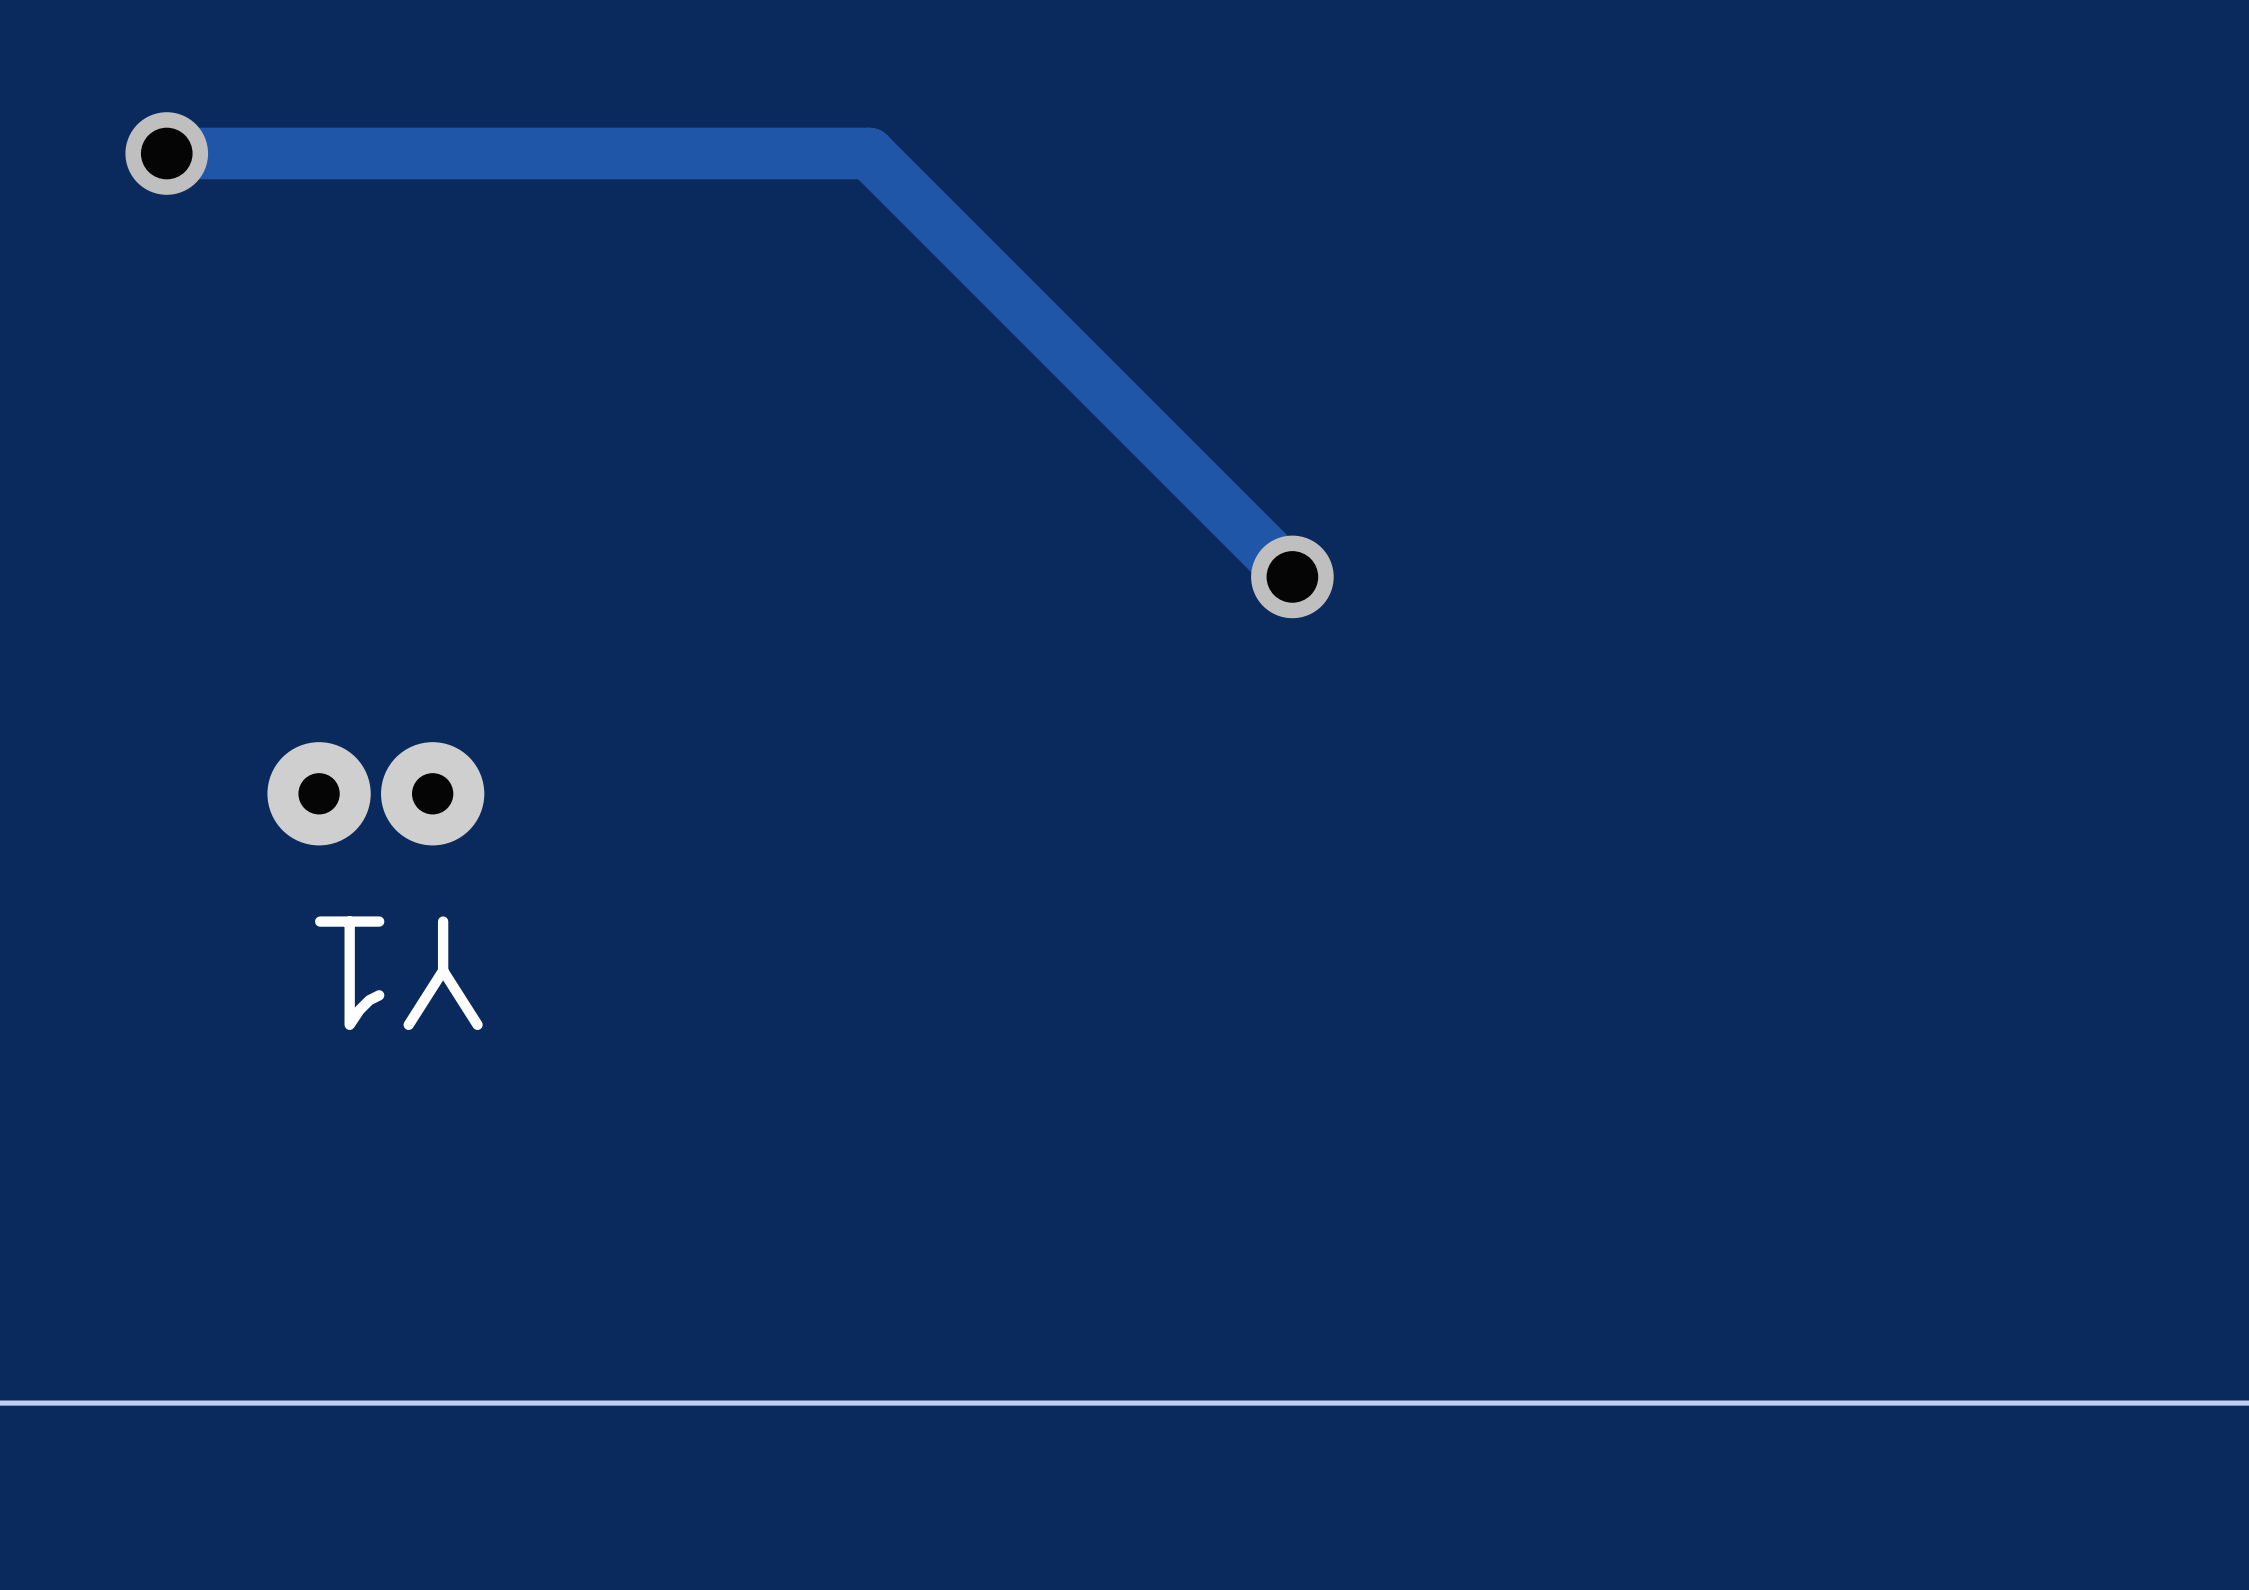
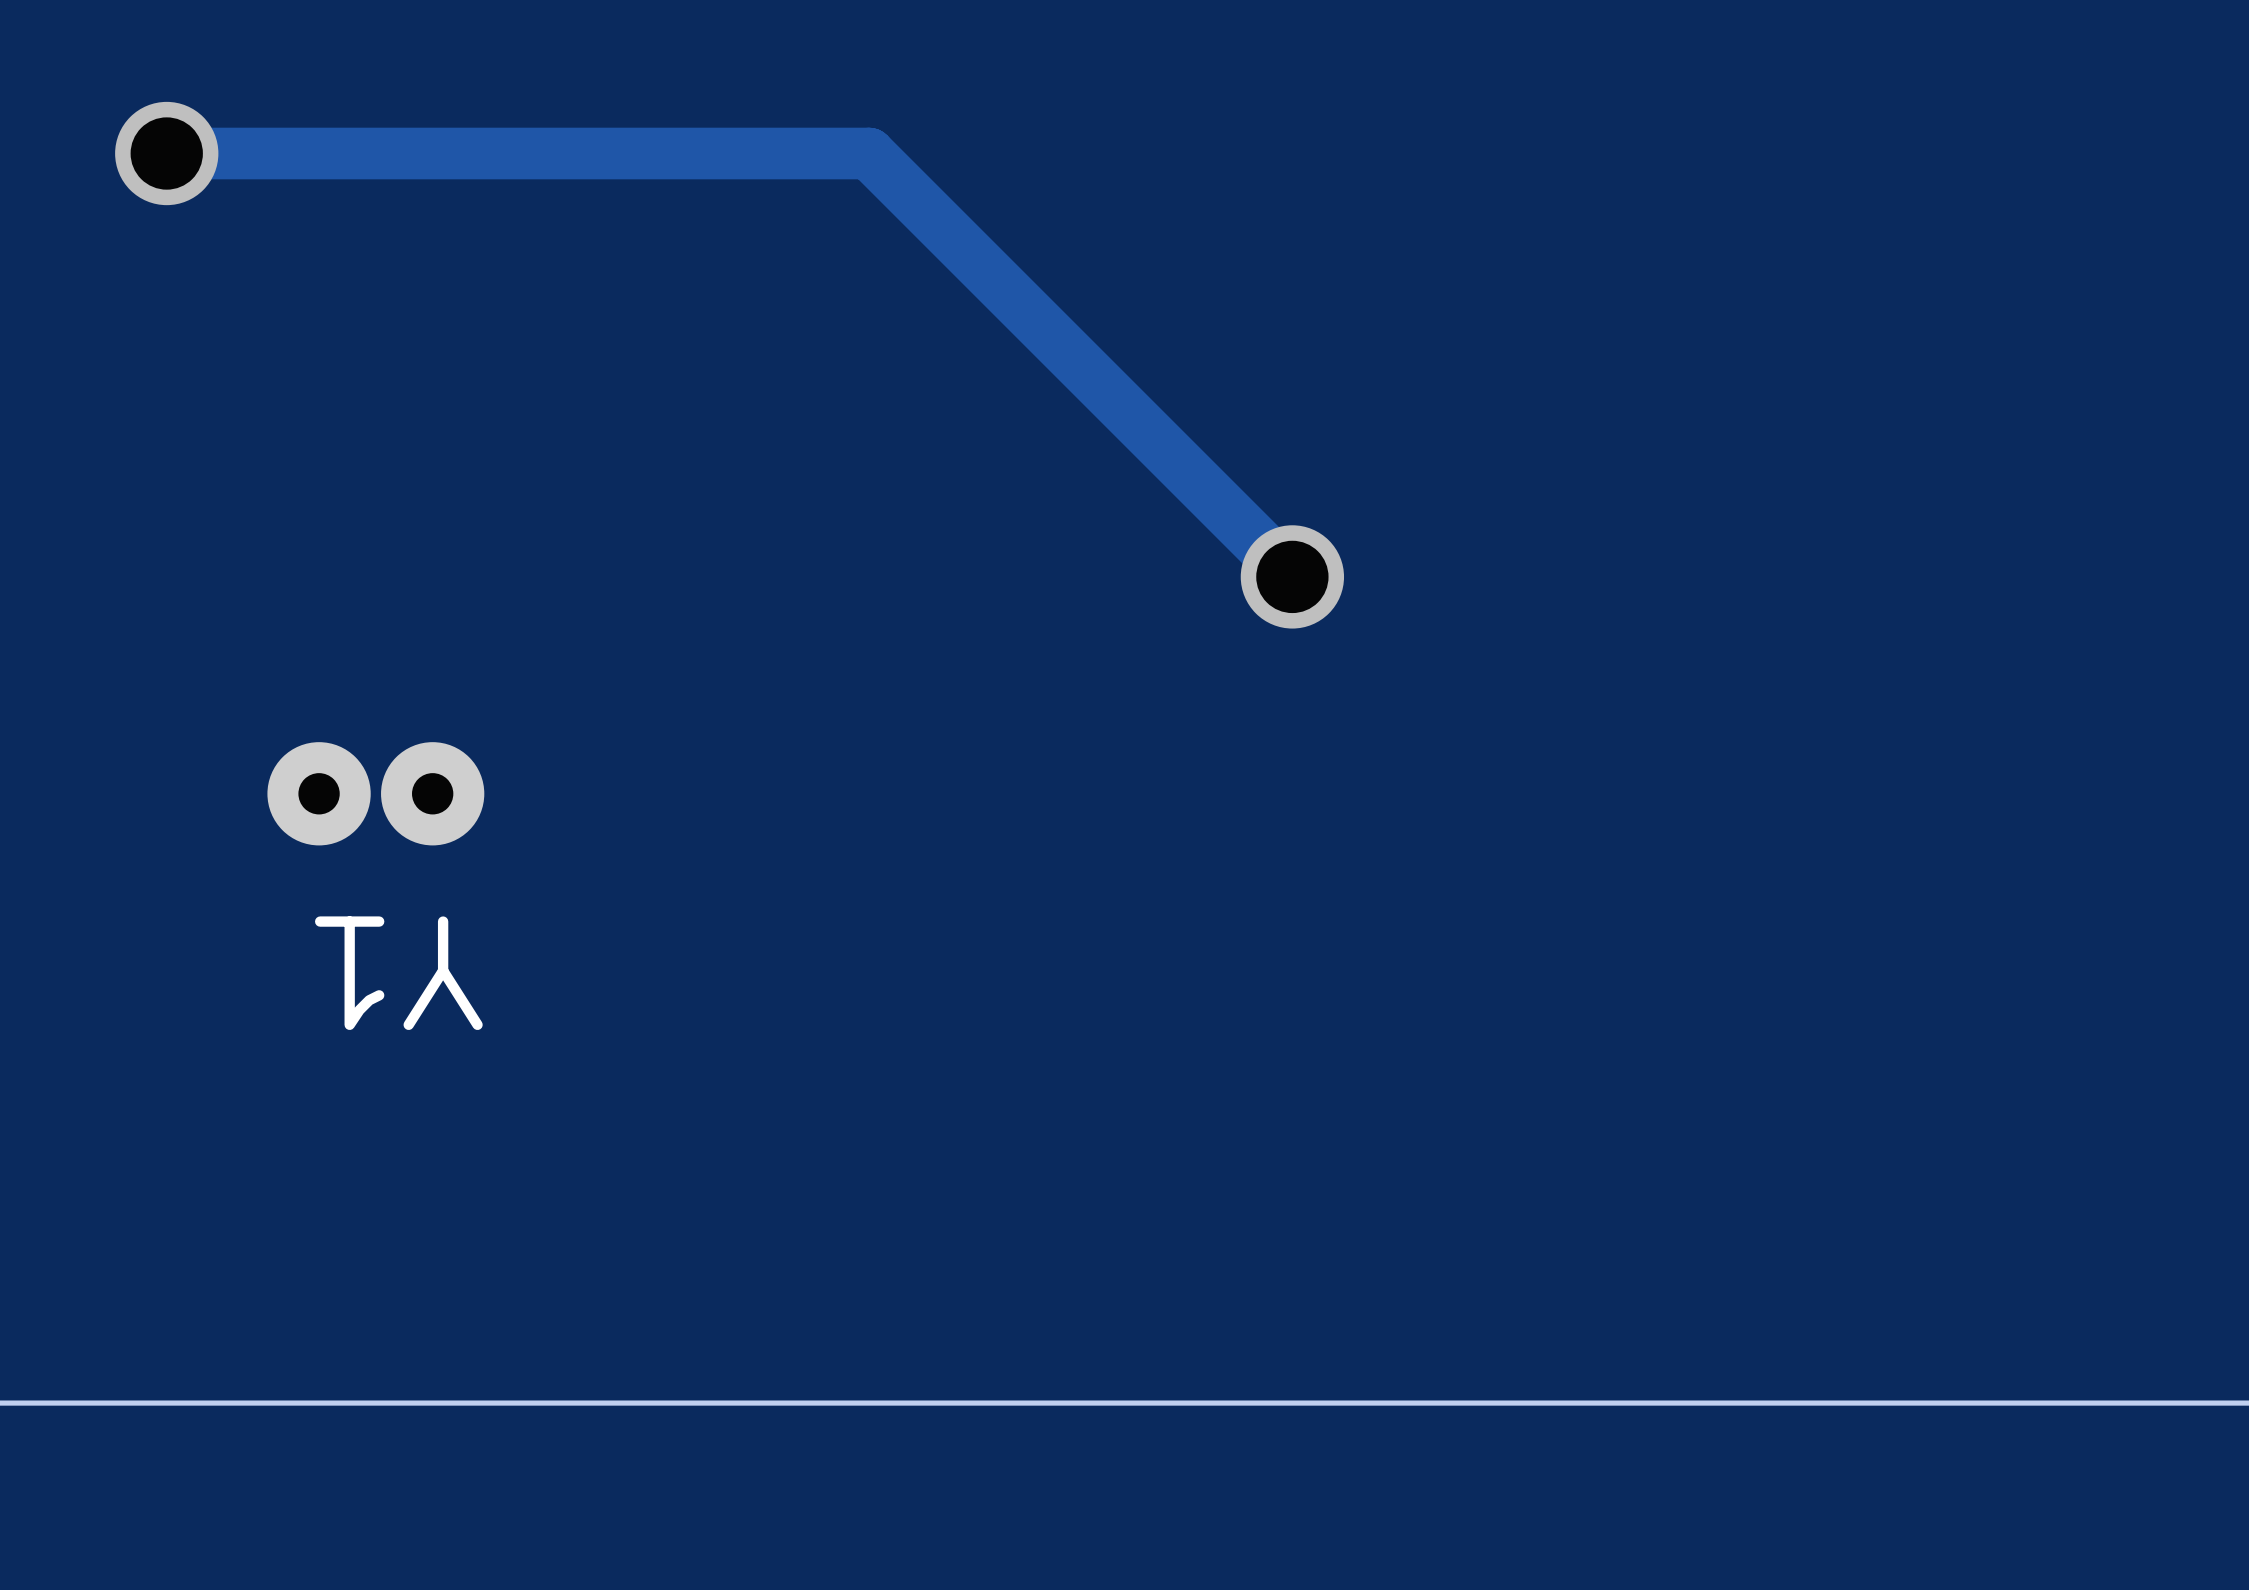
via size: [125, 112, 209, 195] -> [115, 101, 219, 206]
via size: [1251, 535, 1334, 619] -> [1240, 525, 1345, 629]

